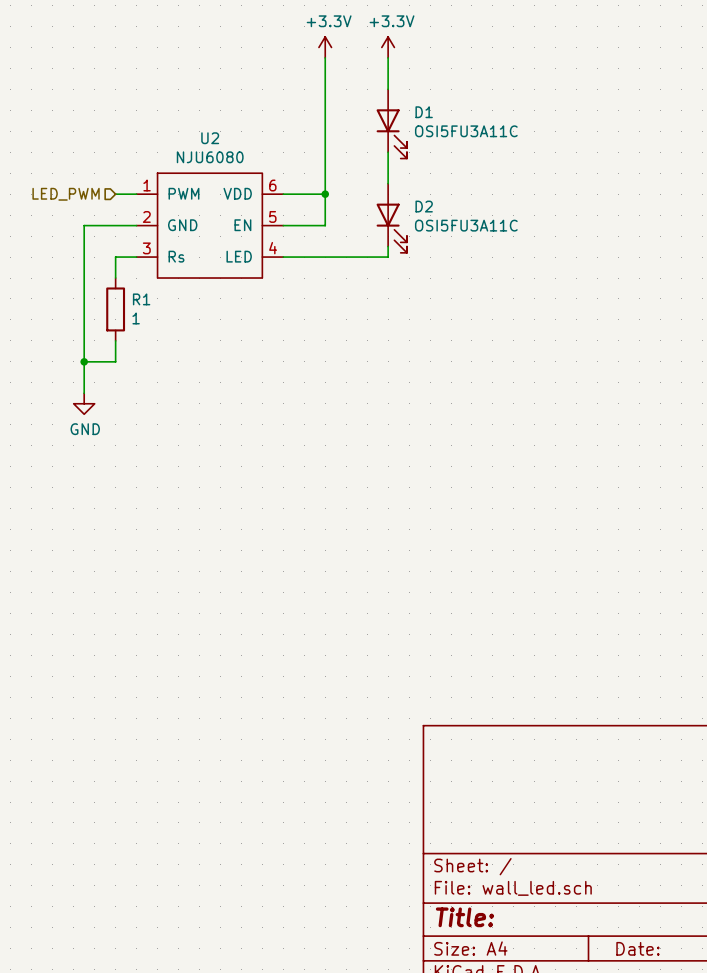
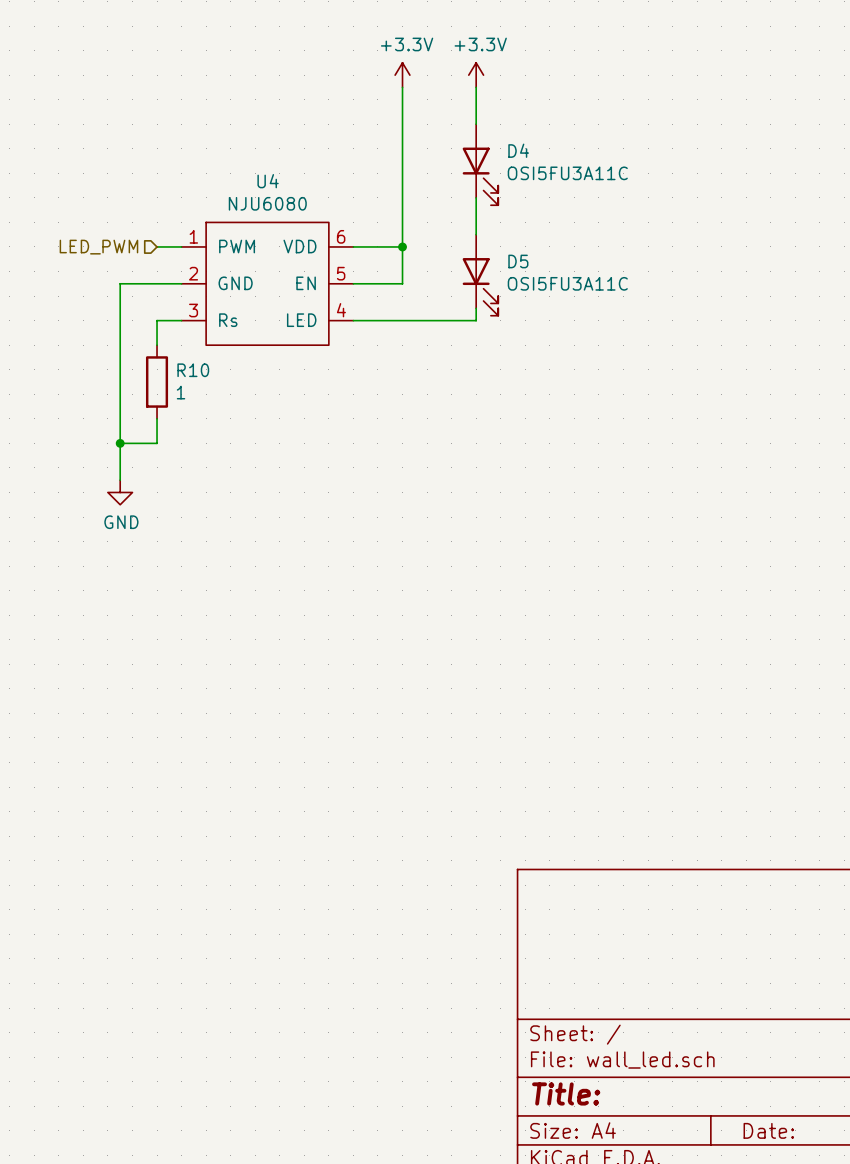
D1 name: D1 (424, 112) -> D4 (518, 150)
U2 name: U2 (210, 138) -> U4 (268, 181)
D2 name: D2 (424, 206) -> D5 (518, 261)
R1 name: R1 (141, 299) -> R10 (193, 370)

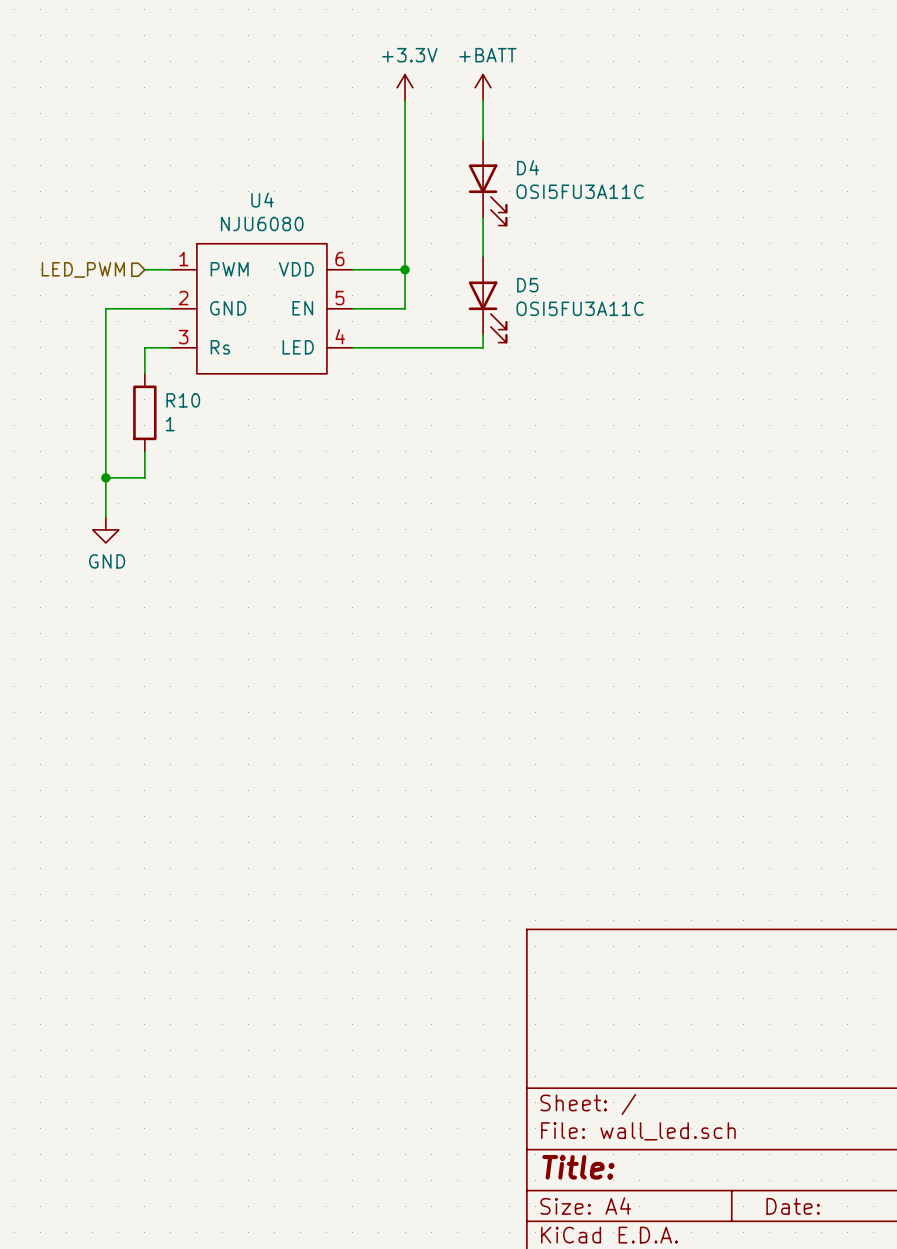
power symbol: +3.3V (476, 75) -> +BATT (483, 87)

